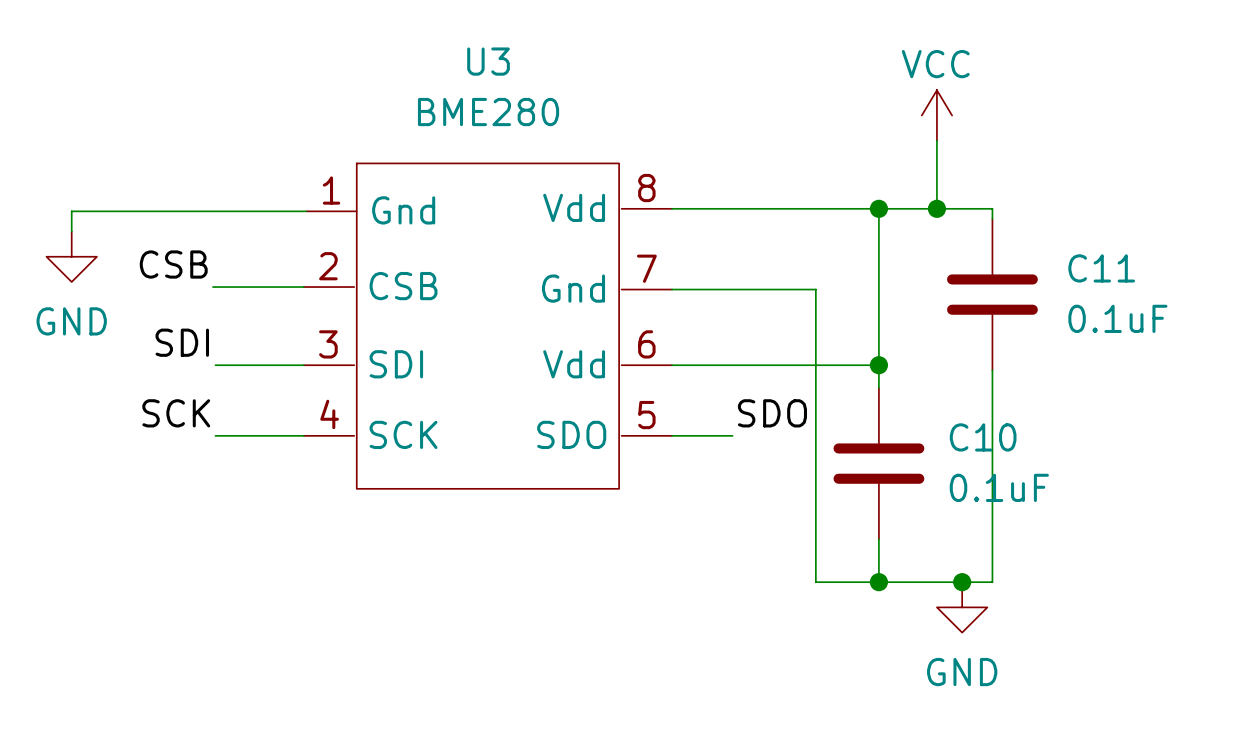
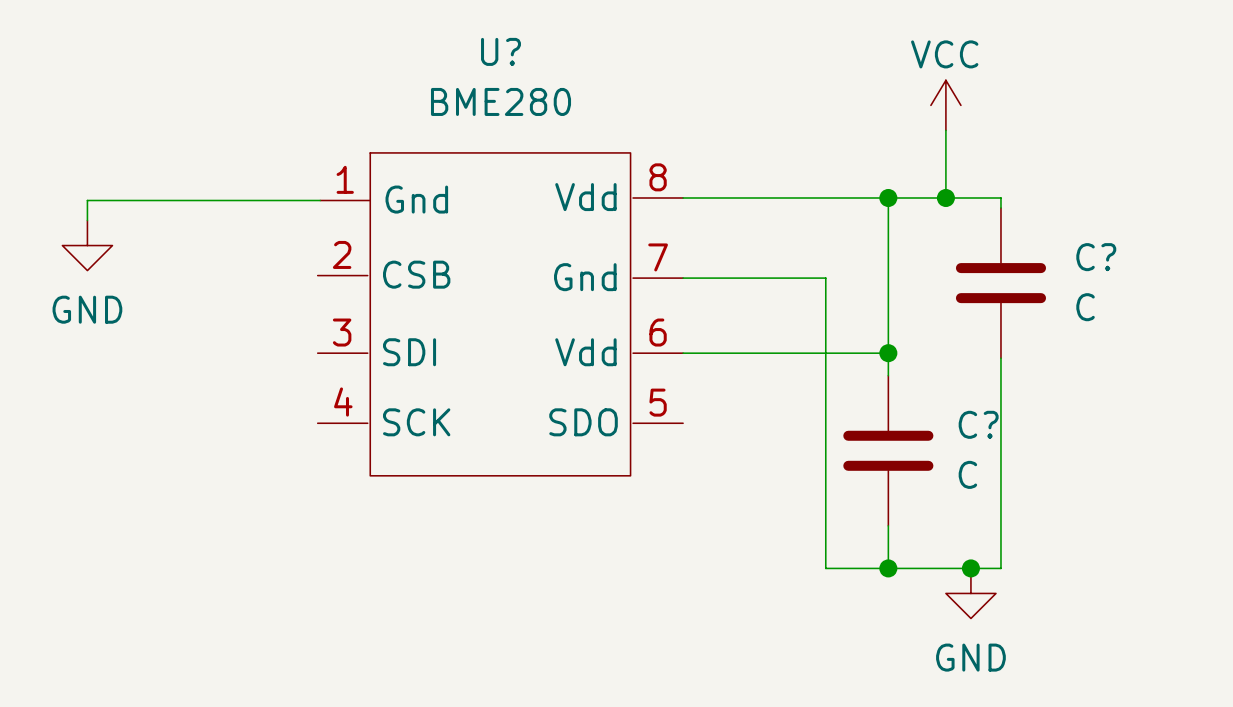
U3 name: U3 (488, 61) -> U? (501, 51)
label: CSB (173, 264) -> none
C11 name: C11 (1101, 268) -> C? (1096, 257)
wire: (212, 287) (303, 287) -> none
C11 value: 0.1uF (1117, 318) -> C (1085, 307)
label: SDI (182, 342) -> none
wire: (215, 365) (303, 365) -> none
label: SCK (176, 413) -> none
label: SDO (772, 413) -> none
wire: (215, 435) (303, 435) -> none
wire: (672, 435) (732, 435) -> none
C10 name: C10 (983, 437) -> C? (978, 424)
C10 value: 0.1uF (999, 487) -> C (967, 474)

